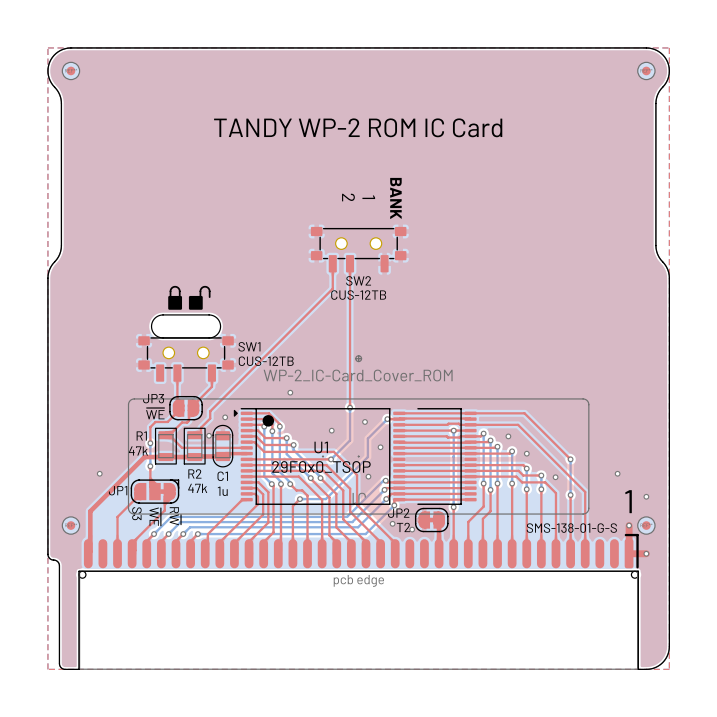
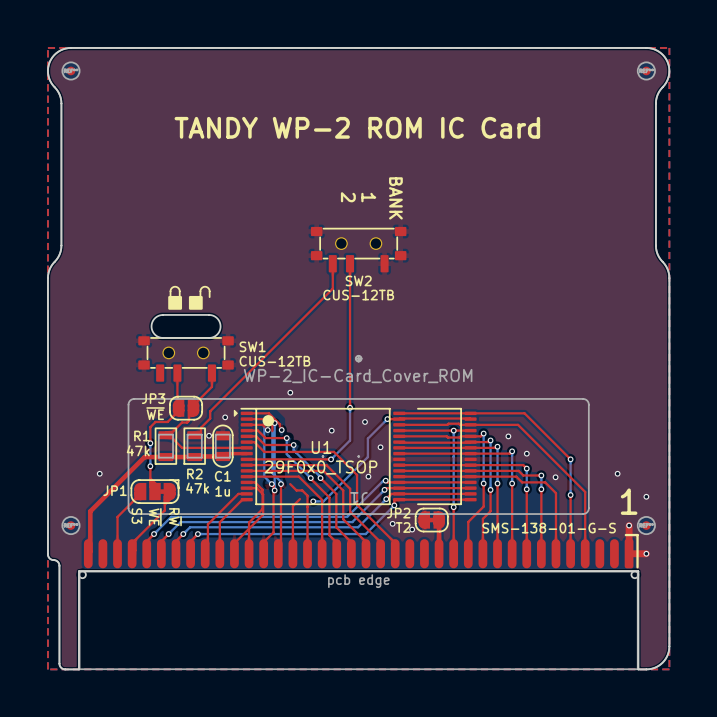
bottom track: none -> (274, 423) (274, 490)
via: none -> (274, 423)
via: (264, 426) -> none
bottom track: (279, 426) (279, 472) (290, 484) -> none
via: (279, 426) -> none
via: none -> (267, 430)
via: none -> (281, 430)
via: (272, 431) -> none
top track: (255, 482) (258, 482) (268, 492) (268, 522) (249, 541) -> (255, 482) (262, 489) (262, 509) (249, 522) (249, 541)
via: (290, 484) -> none
via: none -> (274, 490)
top track: (246, 493) (255, 493) (257, 496) (257, 504) (219, 542) -> (246, 493) (238, 493) (207, 524) (207, 534)
bottom track: (299, 499) (325, 499) -> (313, 501) (323, 501) (325, 499)
via: (299, 499) -> none
via: none -> (313, 501)
top track: (219, 522) (207, 534) -> (219, 522) (219, 542)

